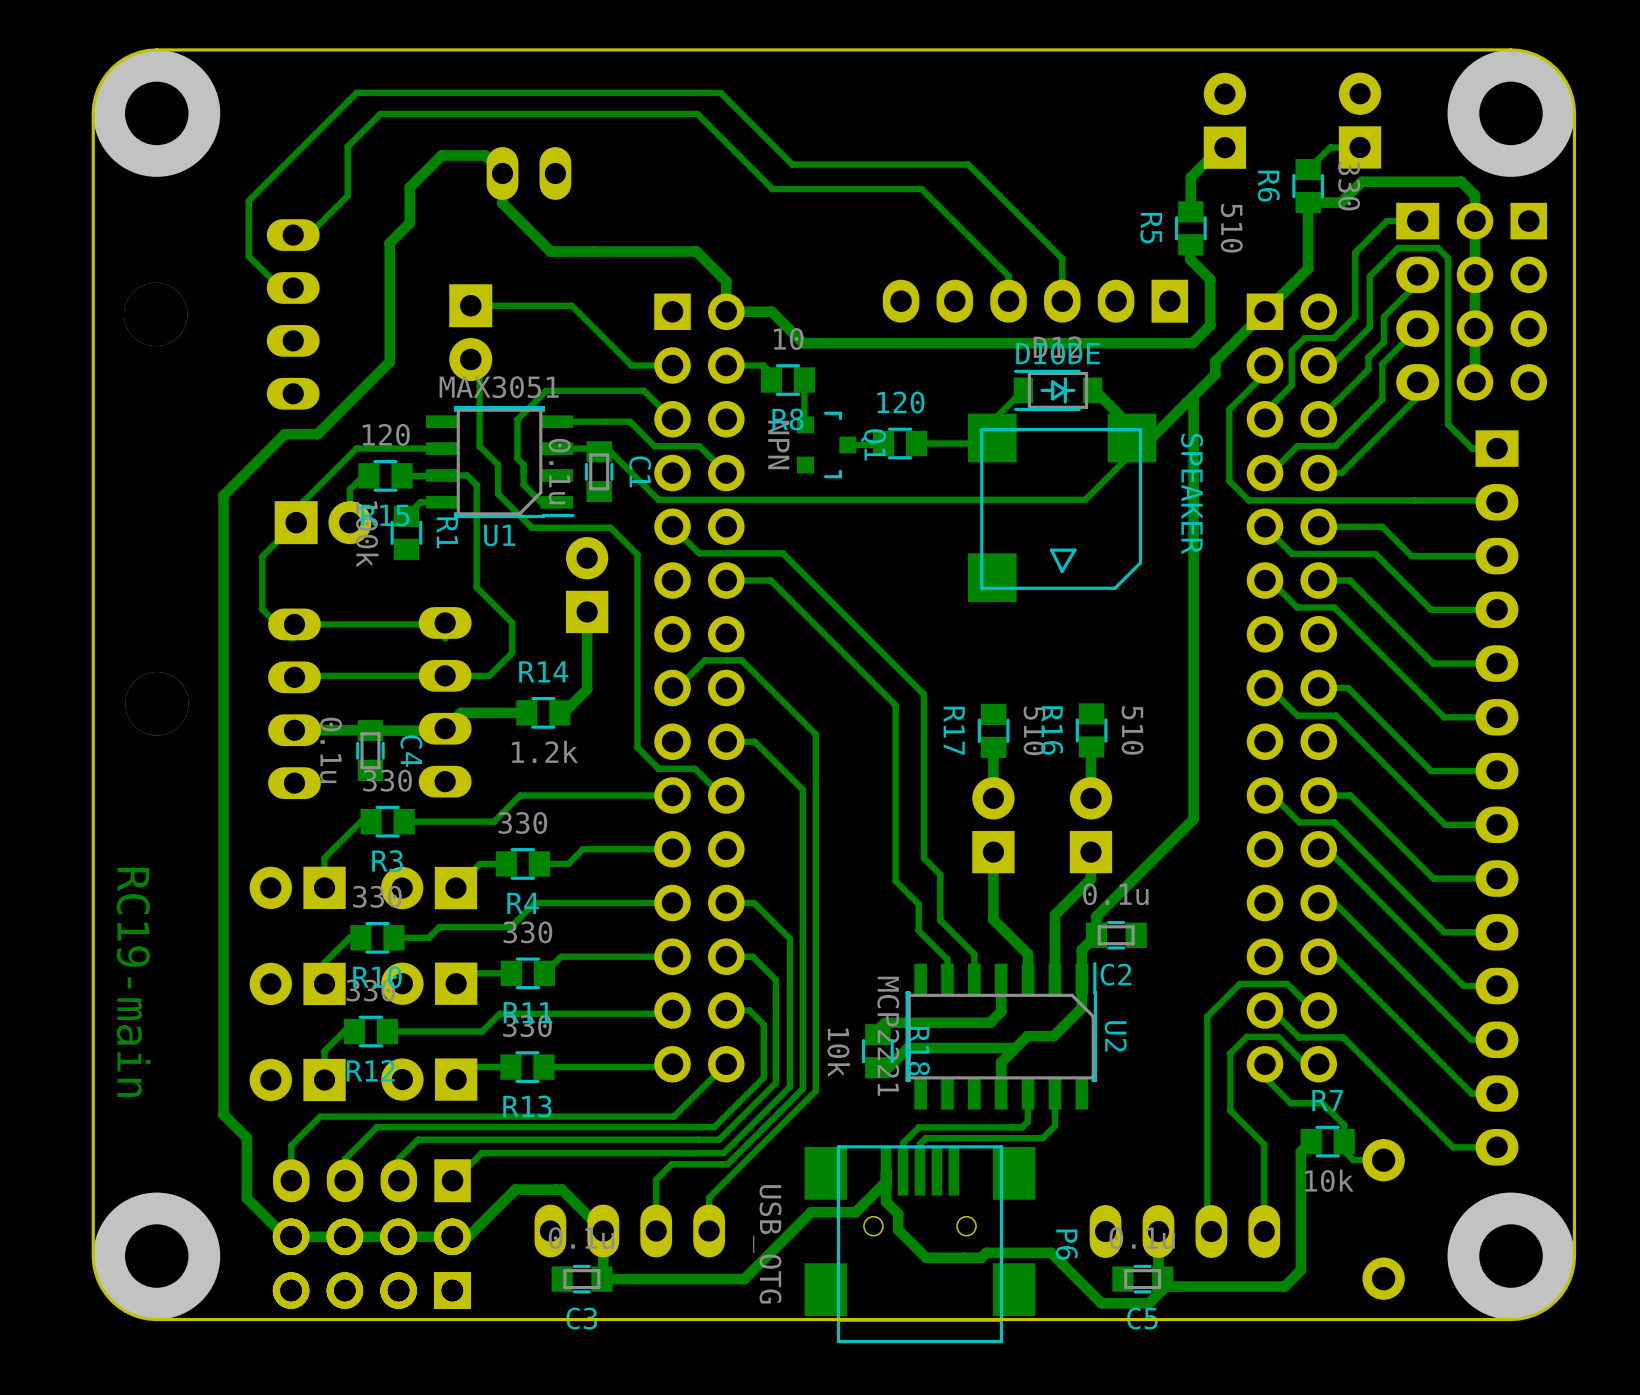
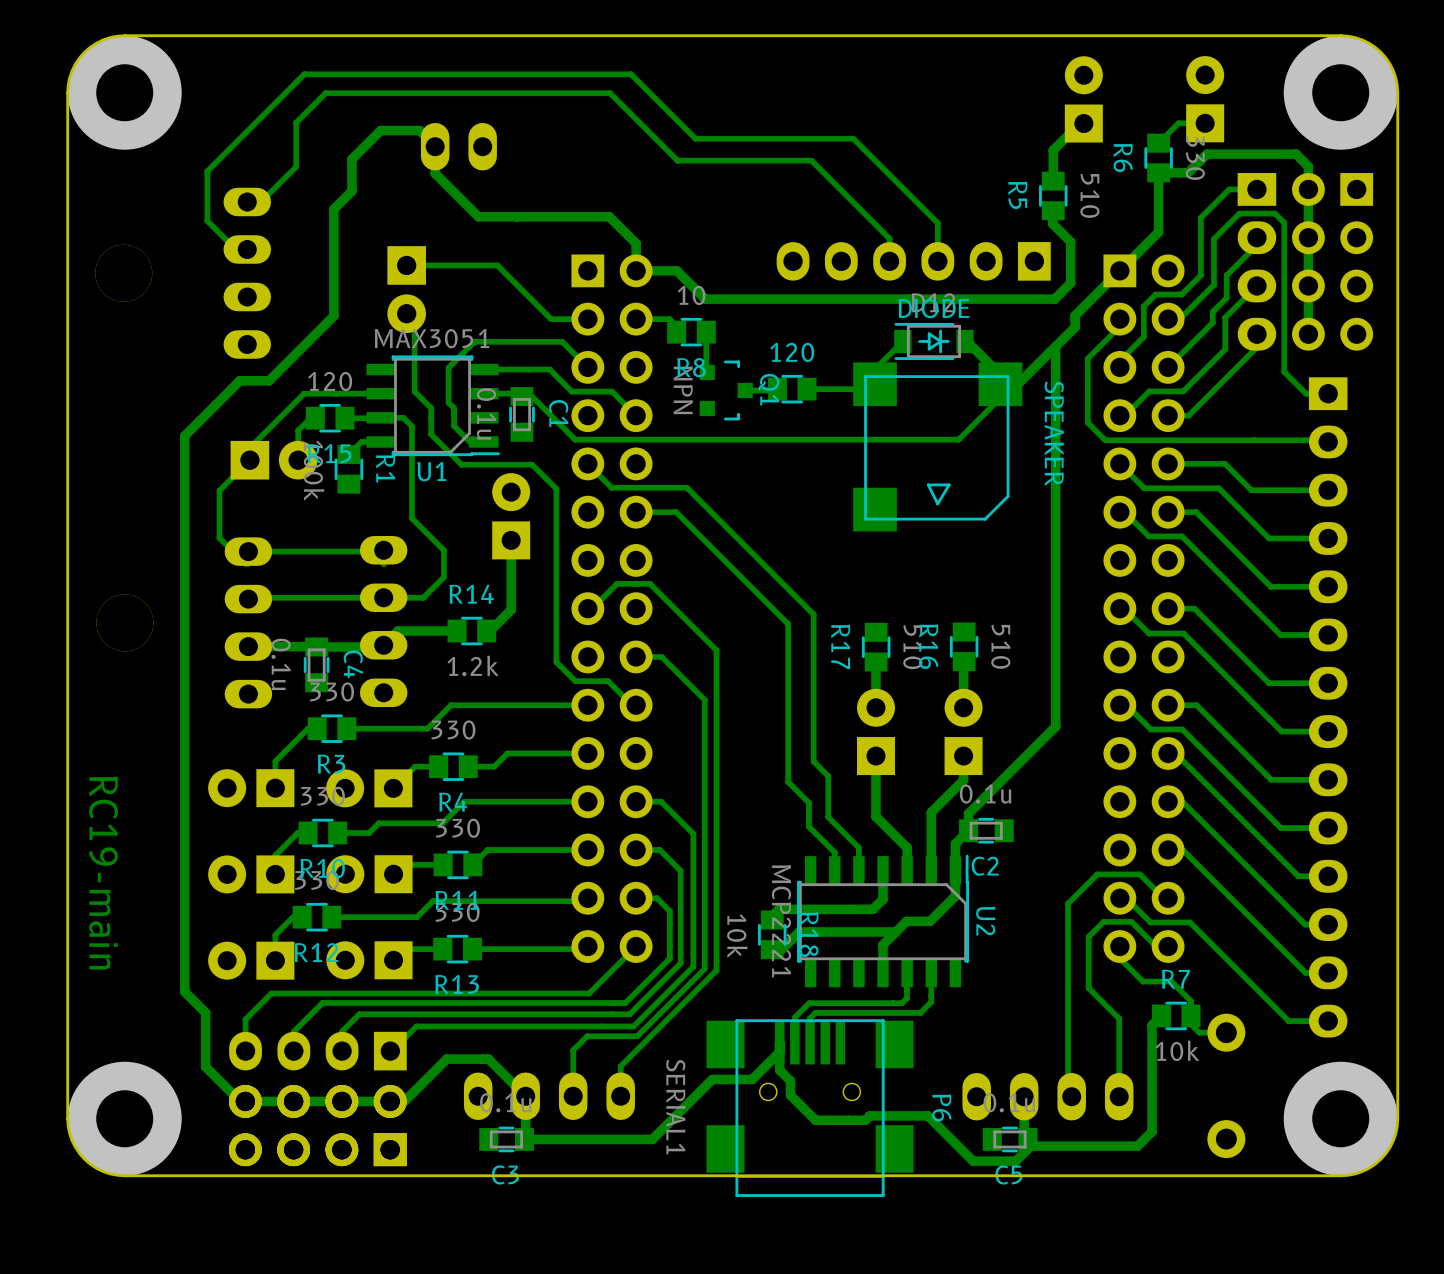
P6 value: USB_OTG (767, 1244) -> SERIAL1 (675, 1107)

